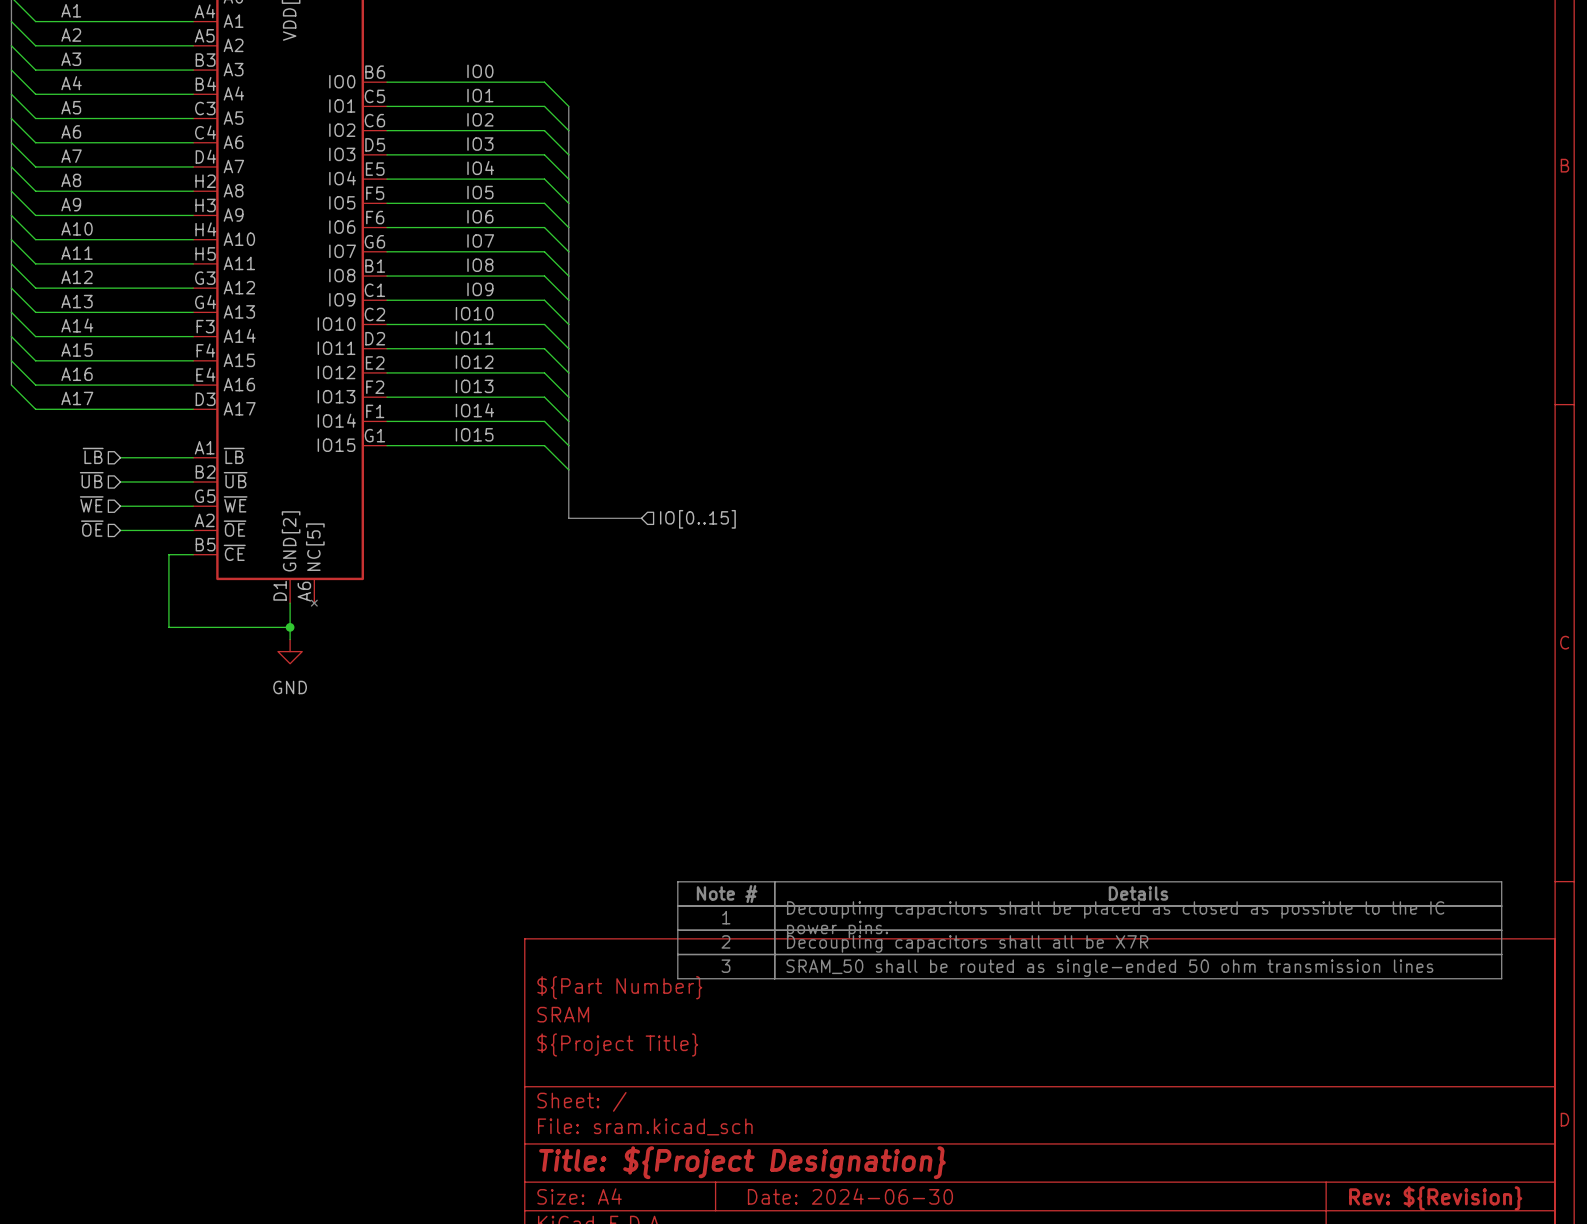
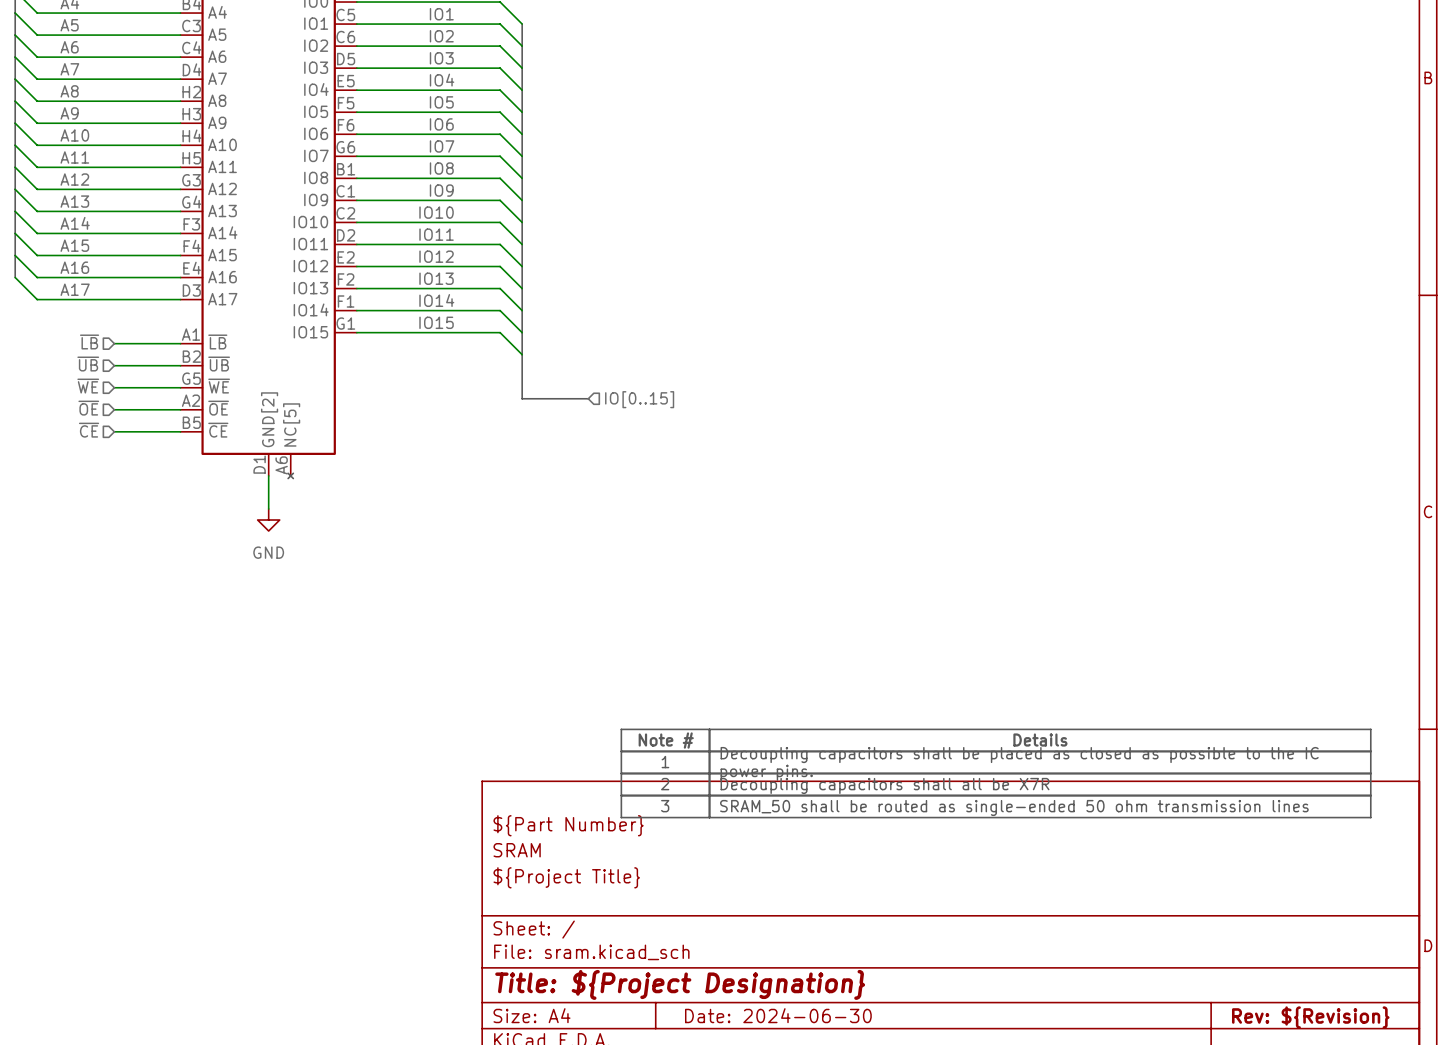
hierarchical label: none -> ~{CE} (89, 430)
wire: (168, 554) (168, 627) (290, 627) -> (158, 431) (114, 431)
junction: (290, 627) -> none

